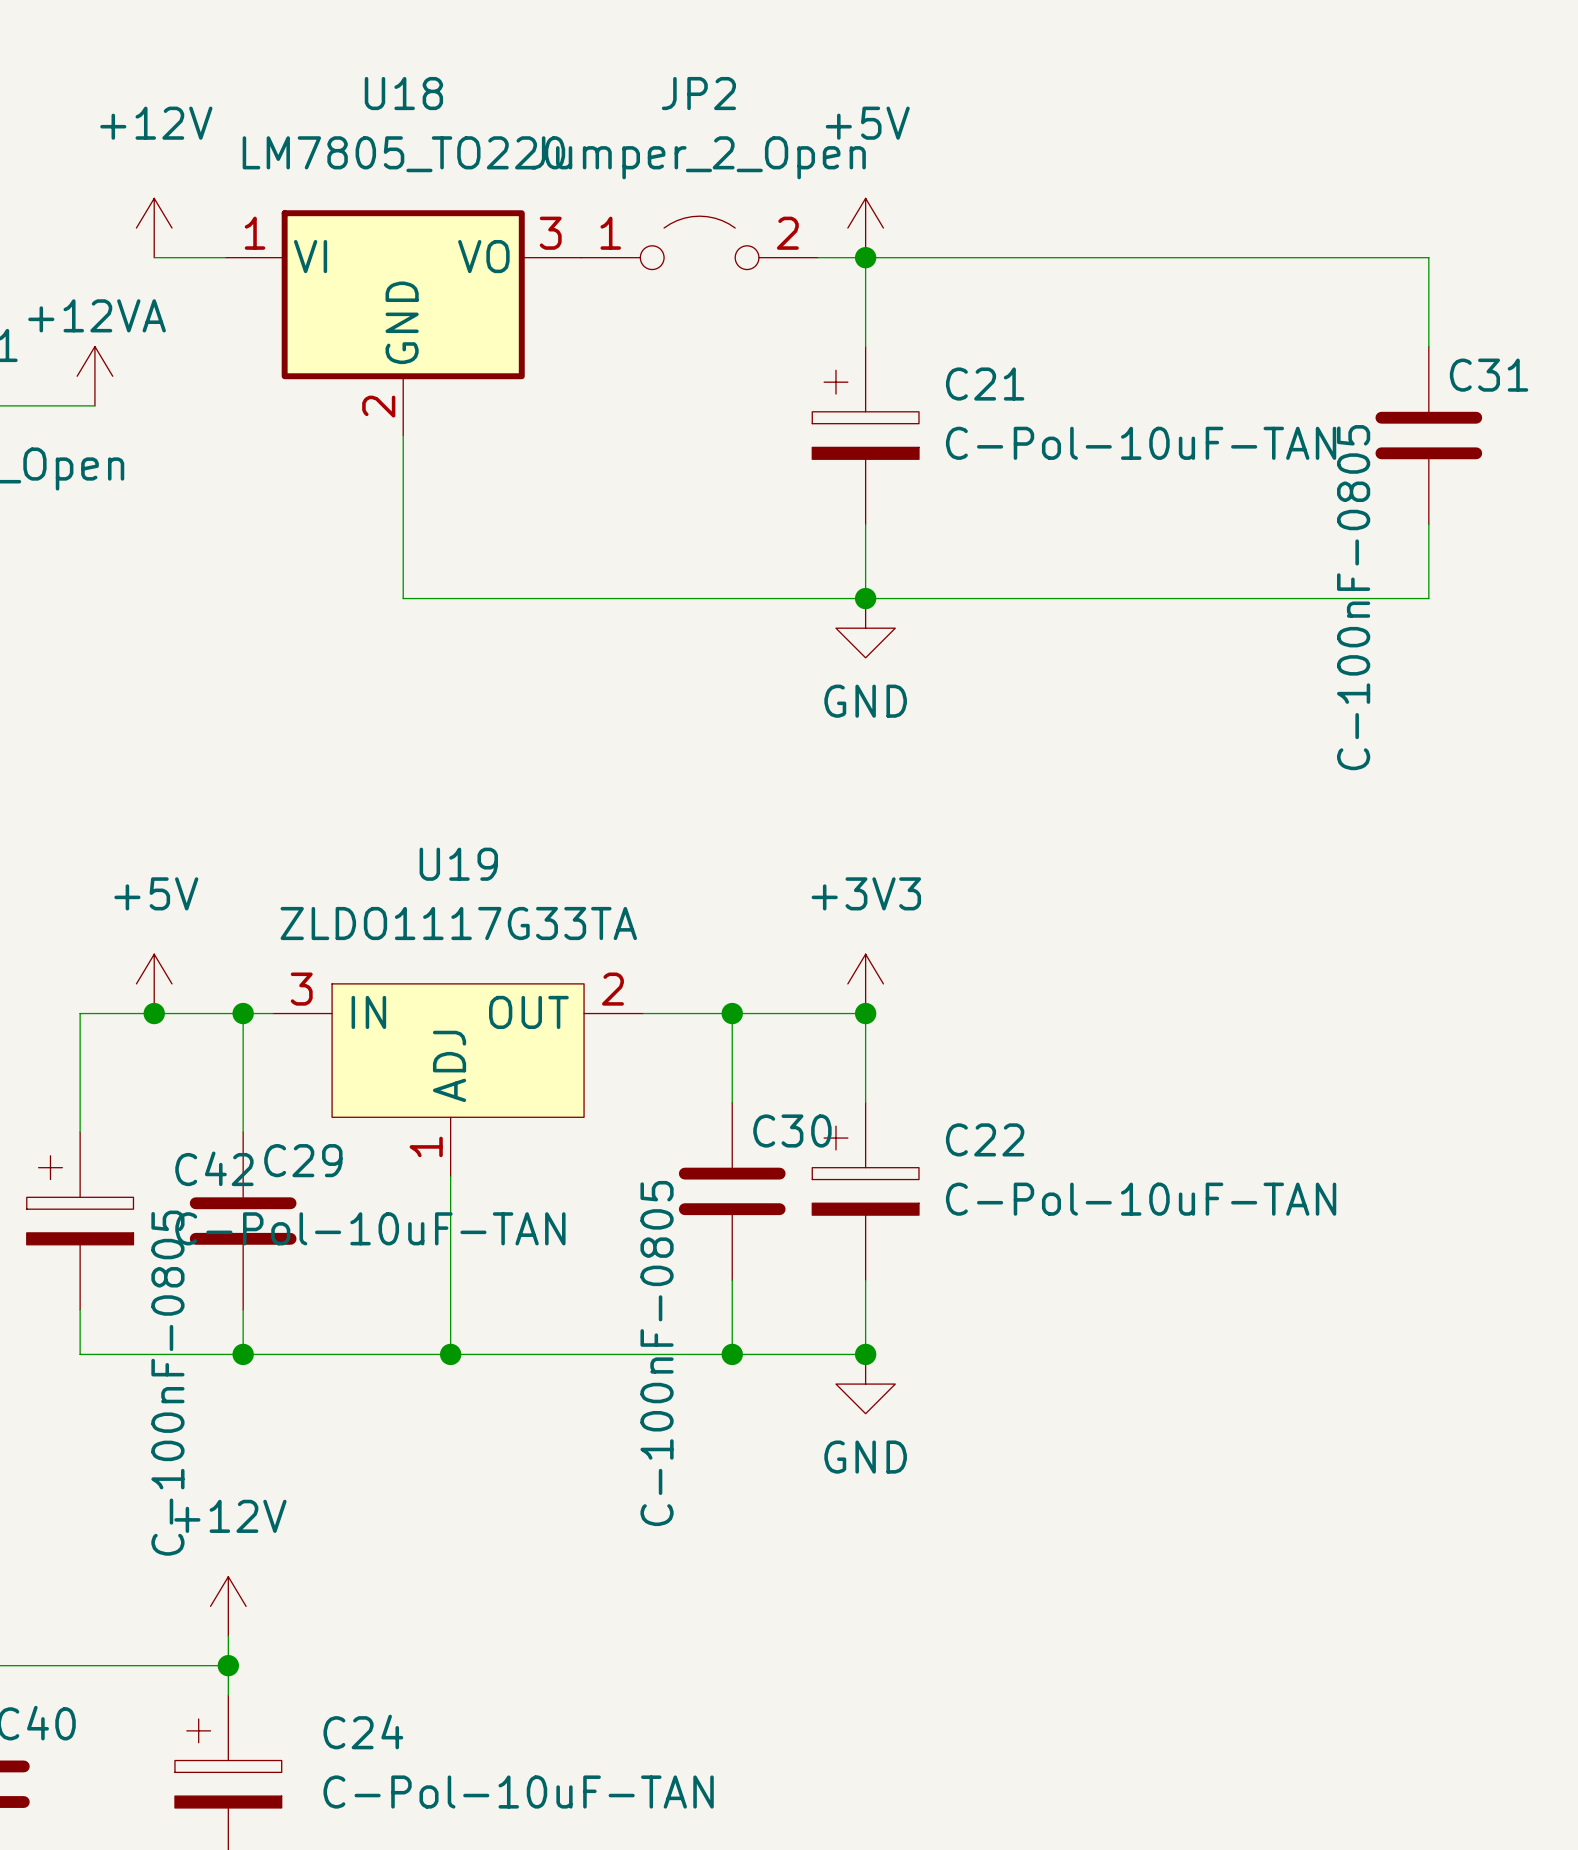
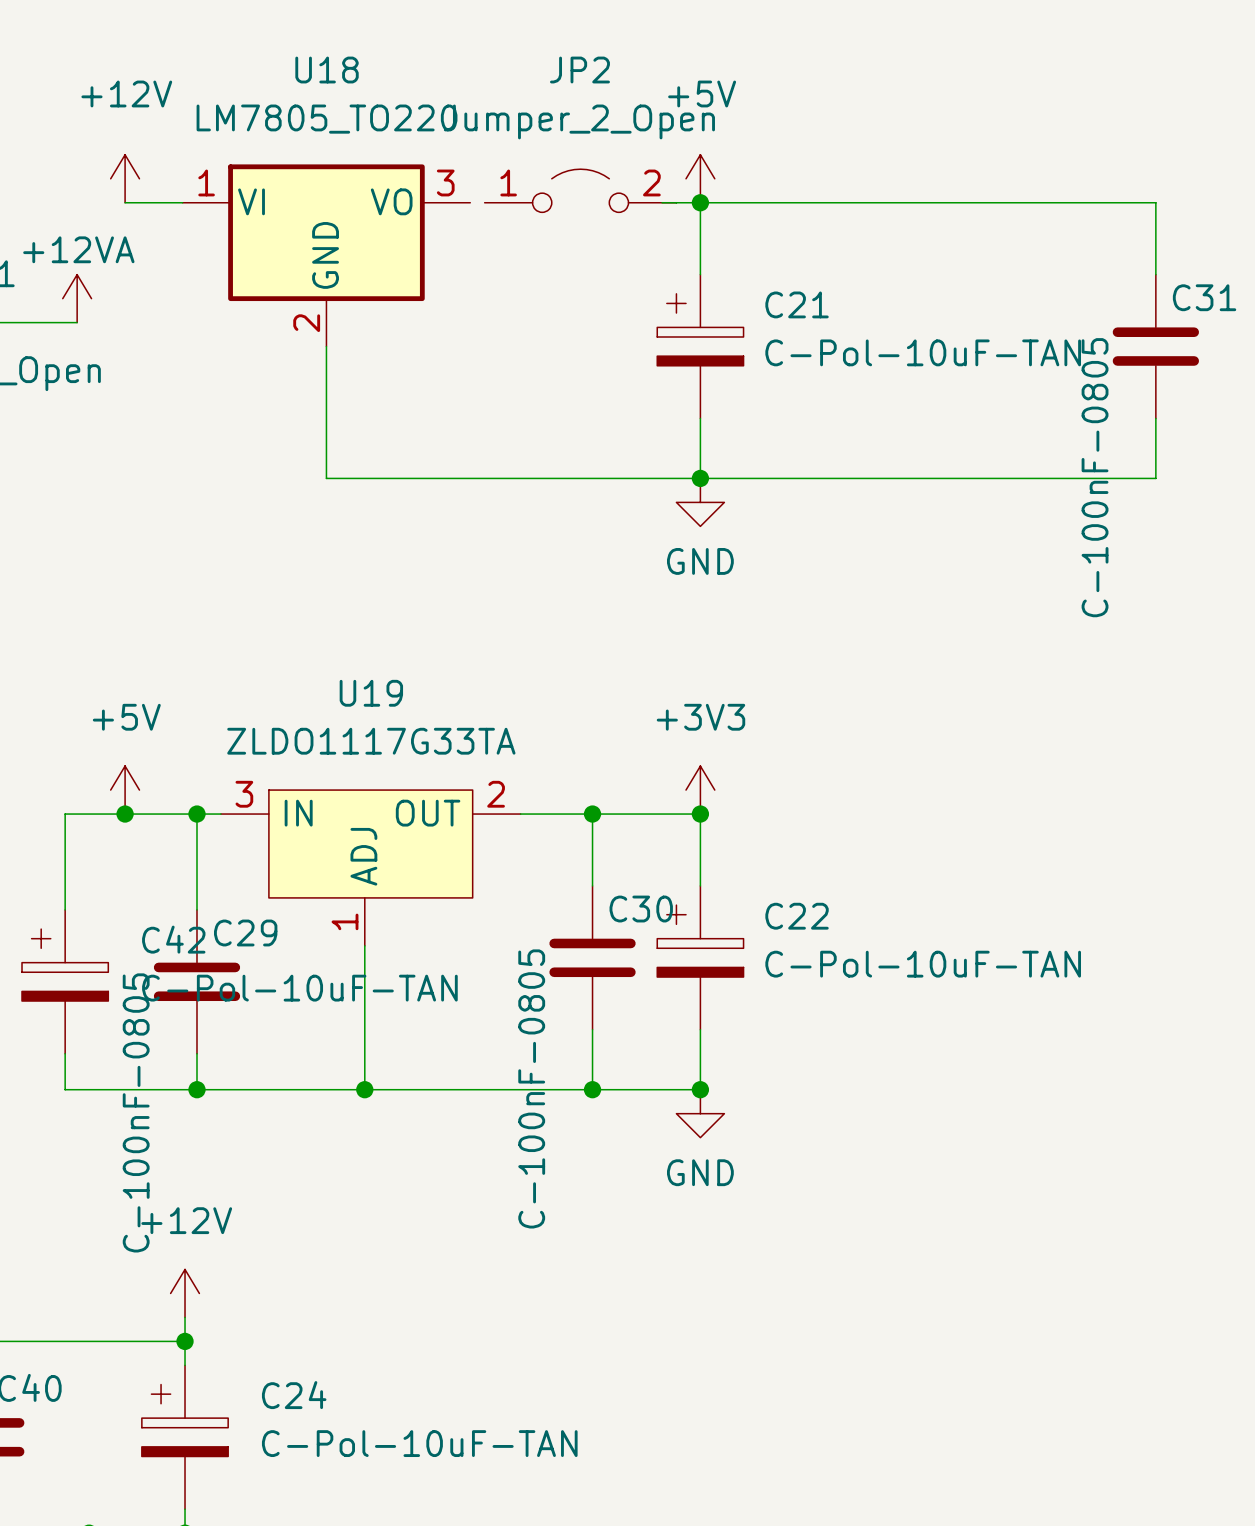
JP2 position: (699, 242) -> (580, 190)

